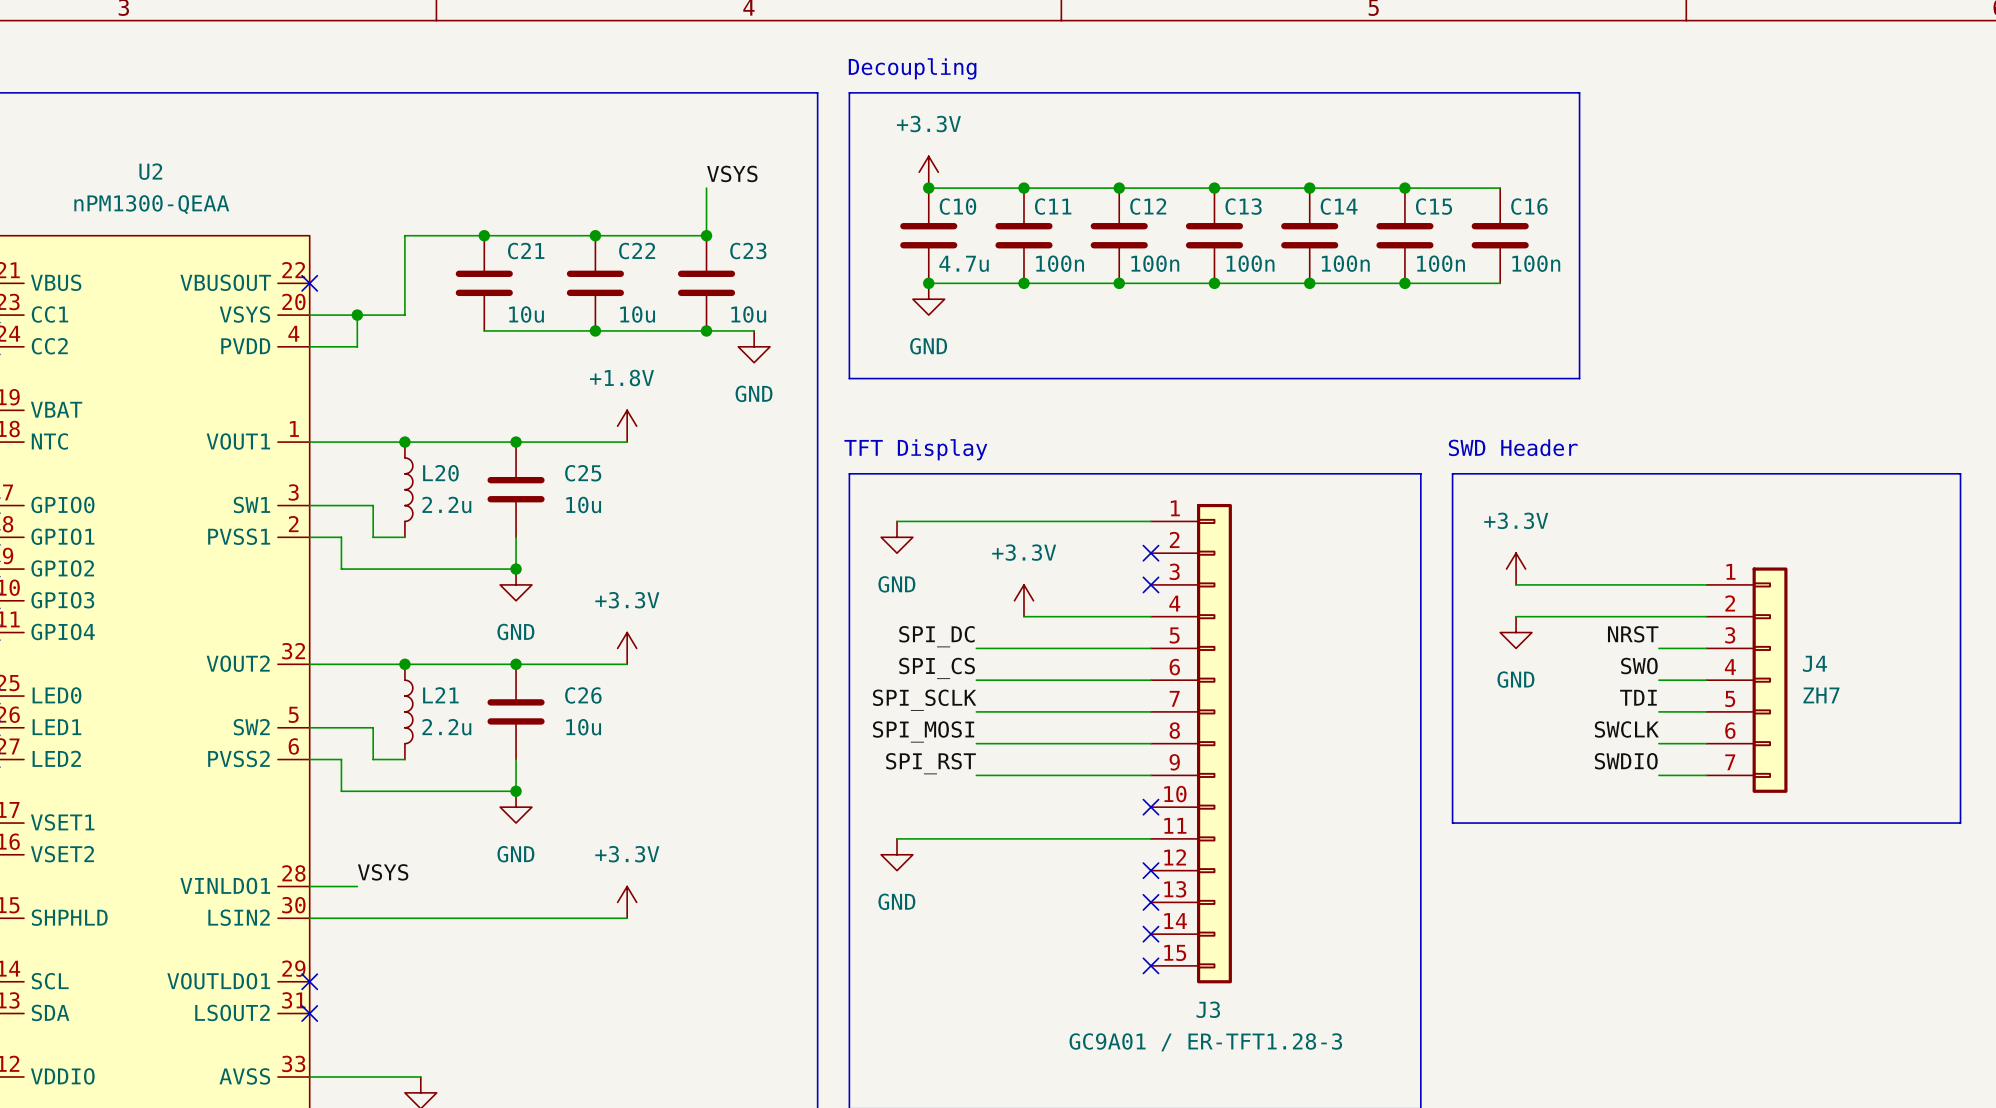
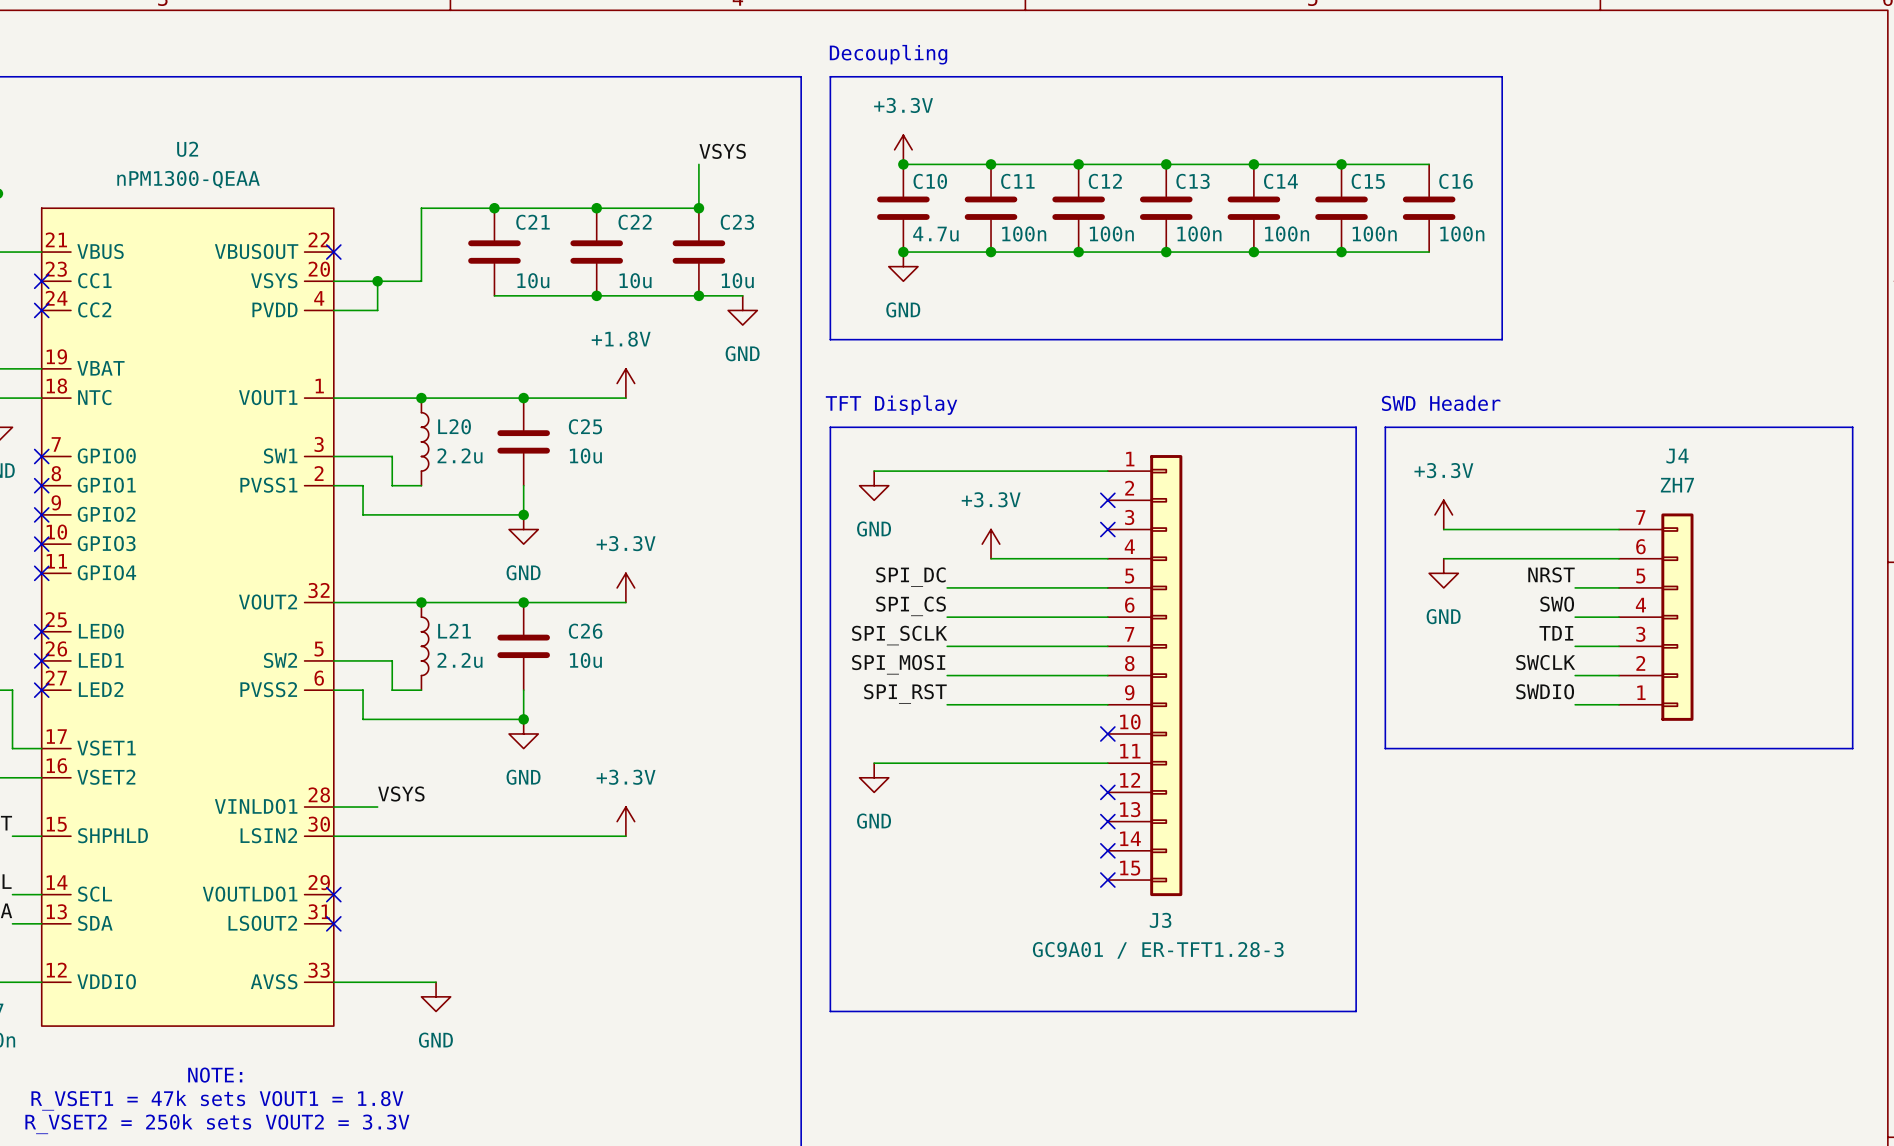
J4 name position: J4 (1814, 663) -> J4 (1677, 456)
J4 flip: as is (1770, 680) -> up-down (1677, 617)
J4 value position: ZH7 (1821, 695) -> ZH7 (1677, 485)

